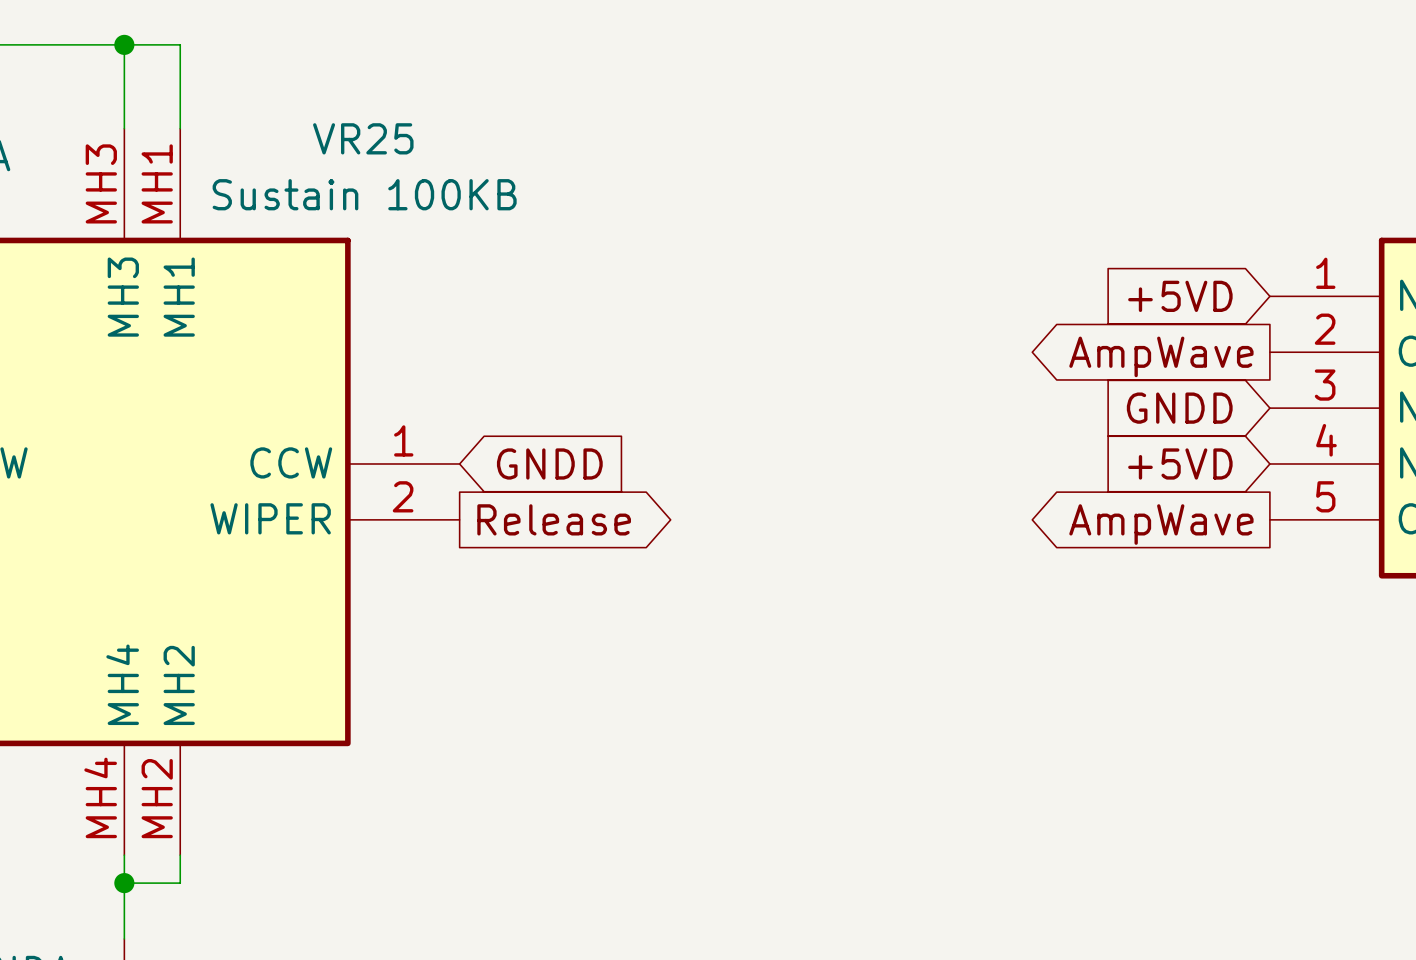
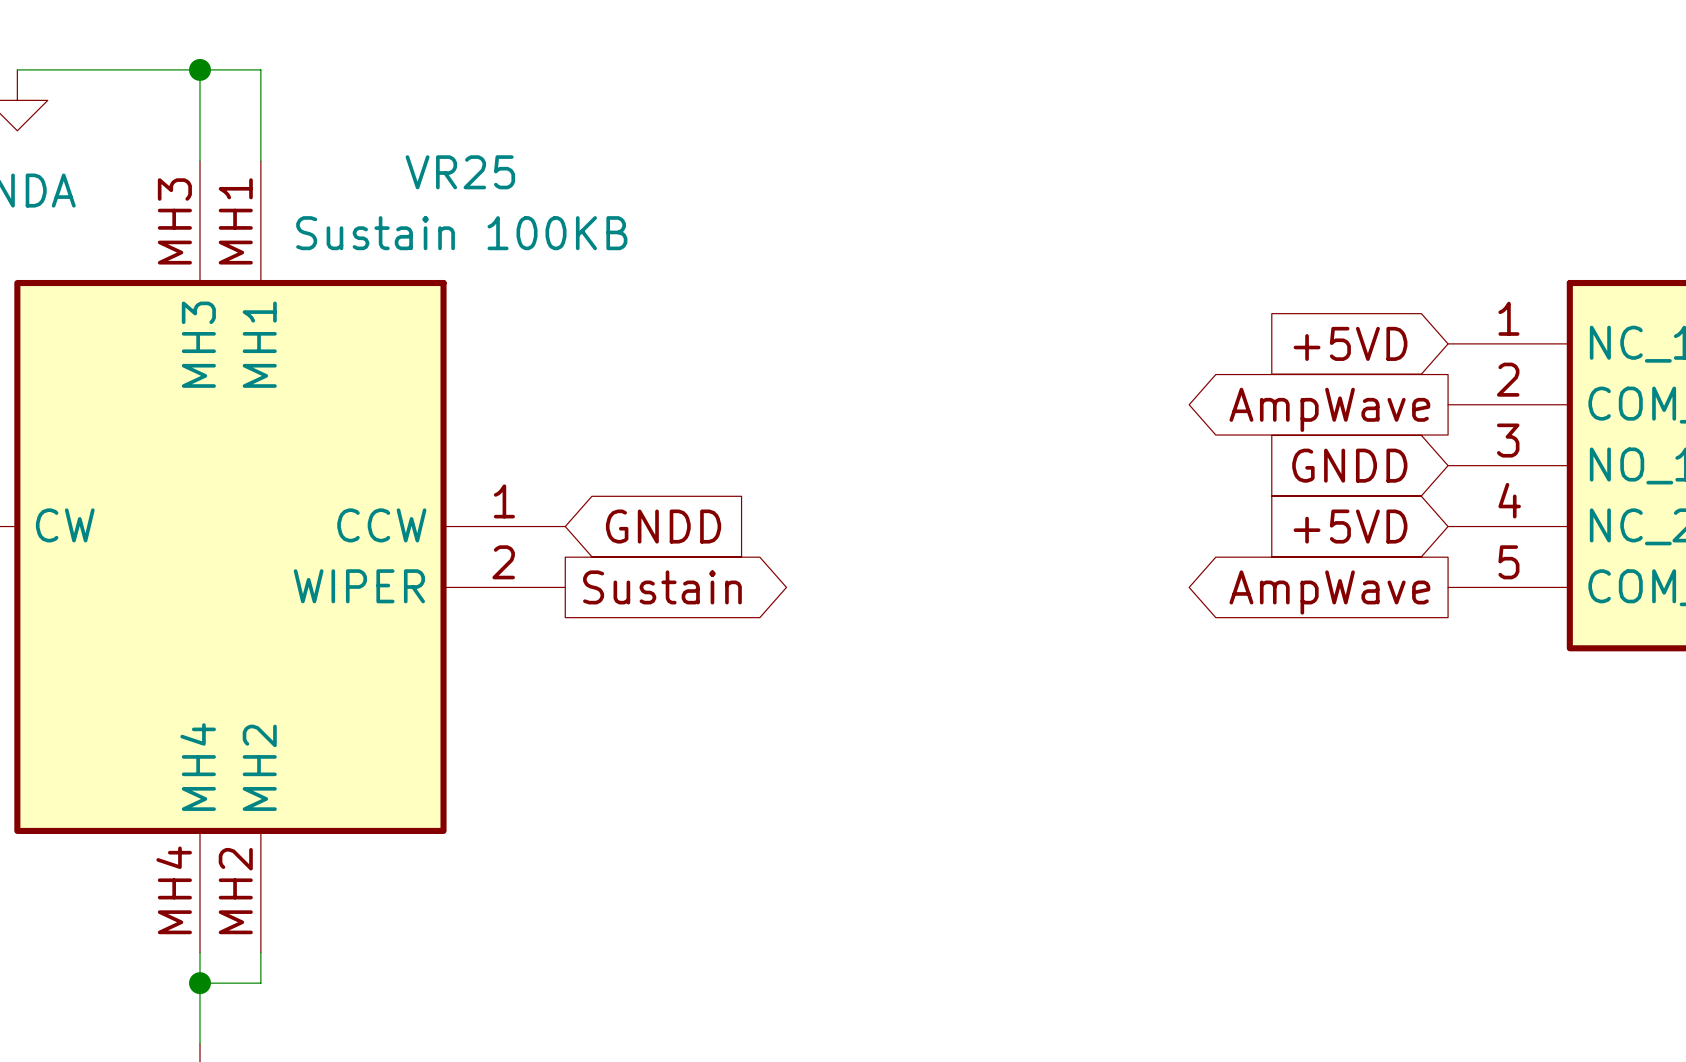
global label: Release (554, 519) -> Sustain (662, 587)

